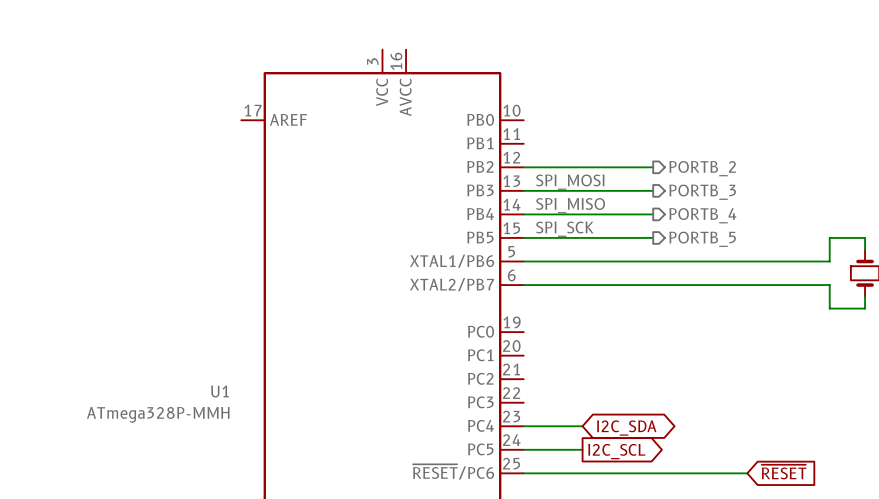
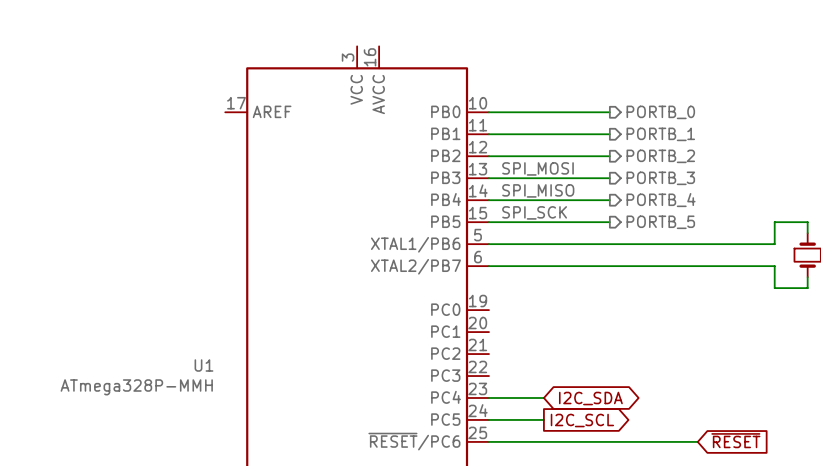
wire: none -> (488, 112) (609, 112)
hierarchical label: none -> PORTB_0 (660, 112)
wire: none -> (488, 134) (609, 134)
hierarchical label: none -> PORTB_1 (660, 134)

